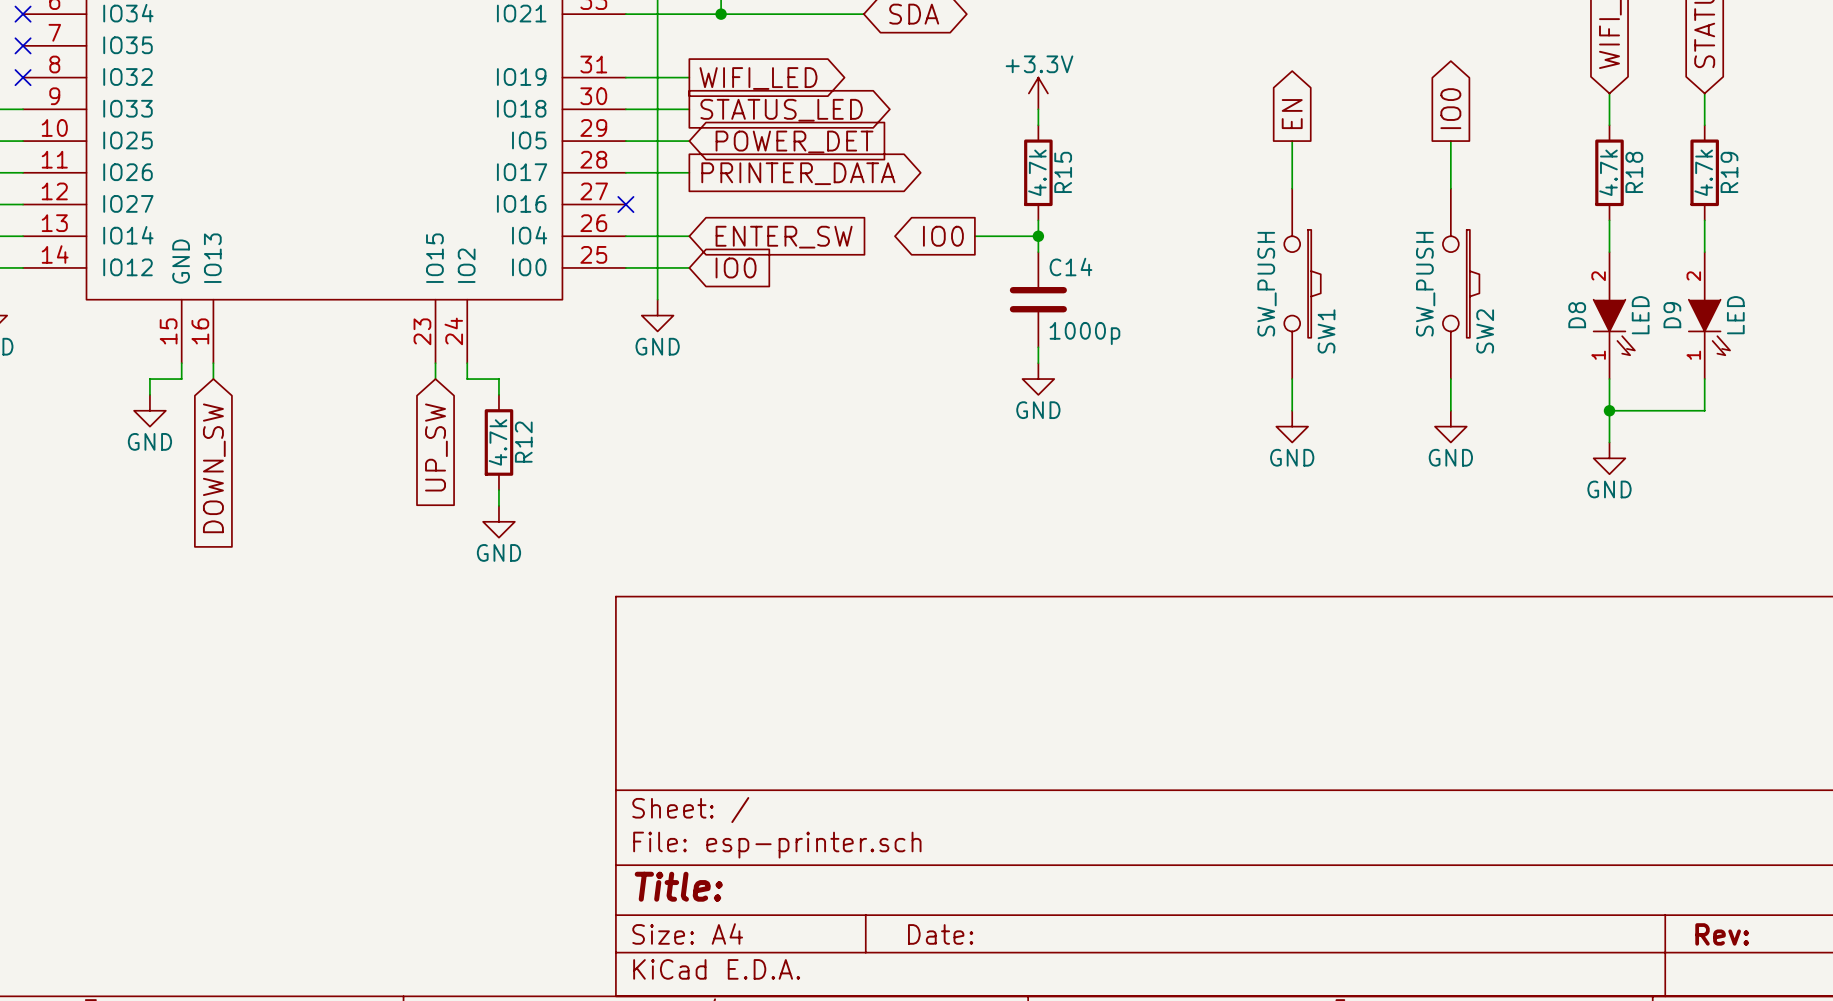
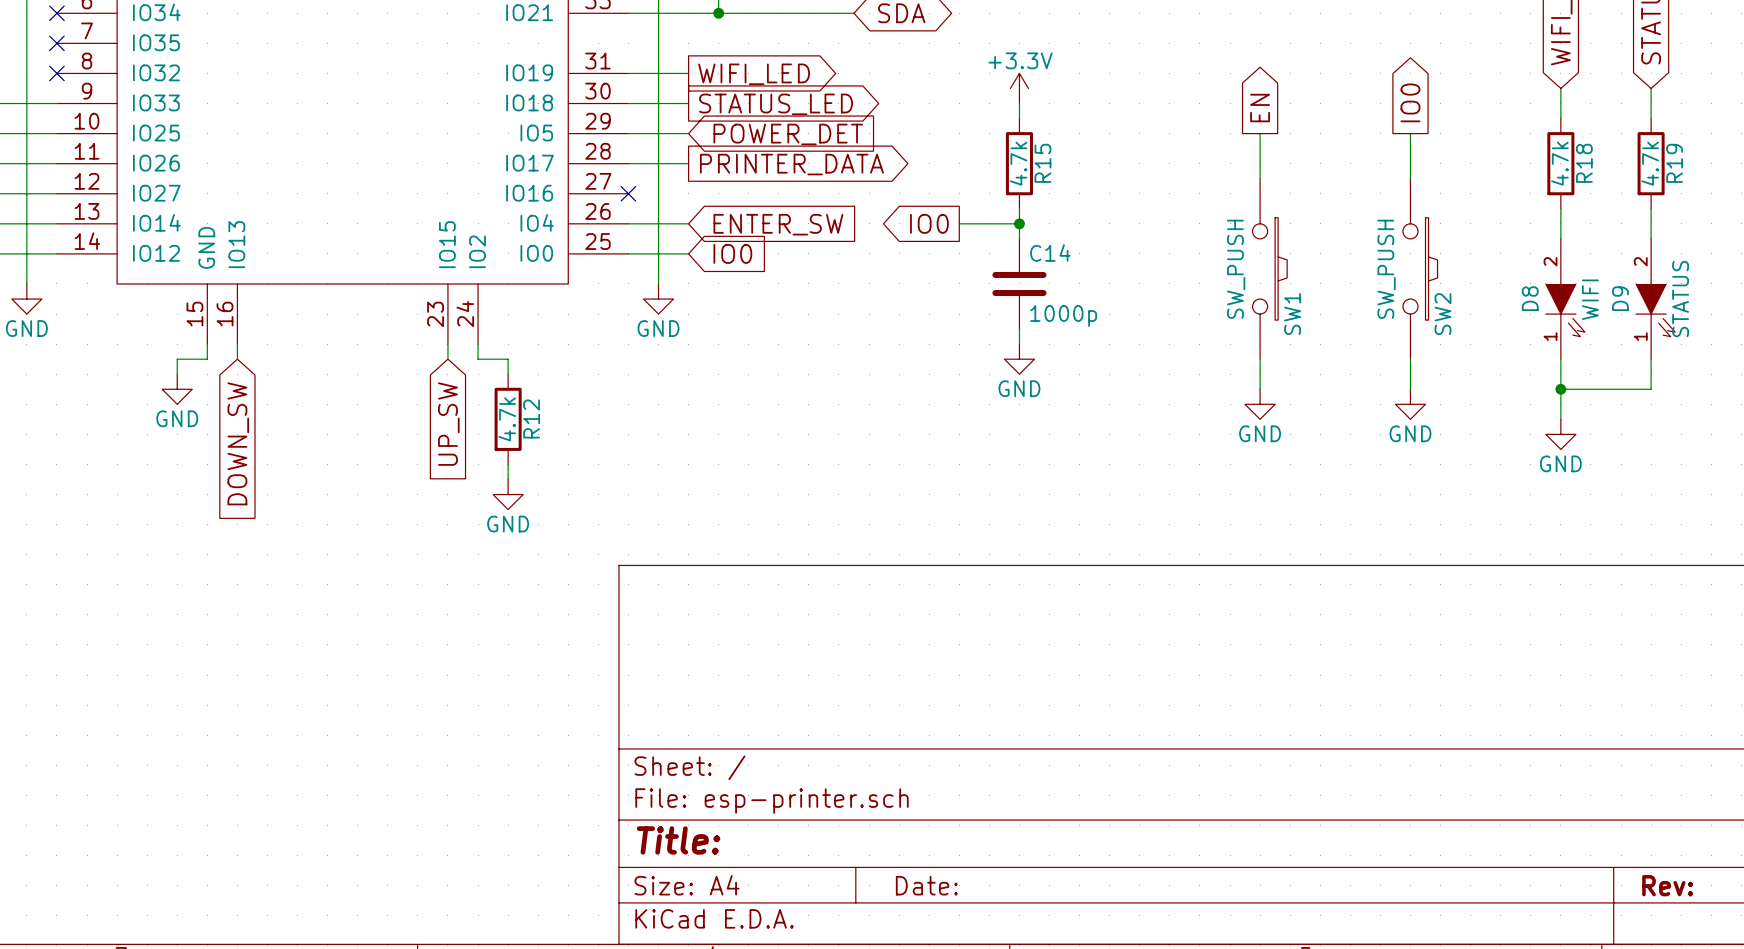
D8 value: LED (1640, 315) -> WIFI (1590, 299)
D9 value: LED (1735, 315) -> STATUS (1680, 299)

